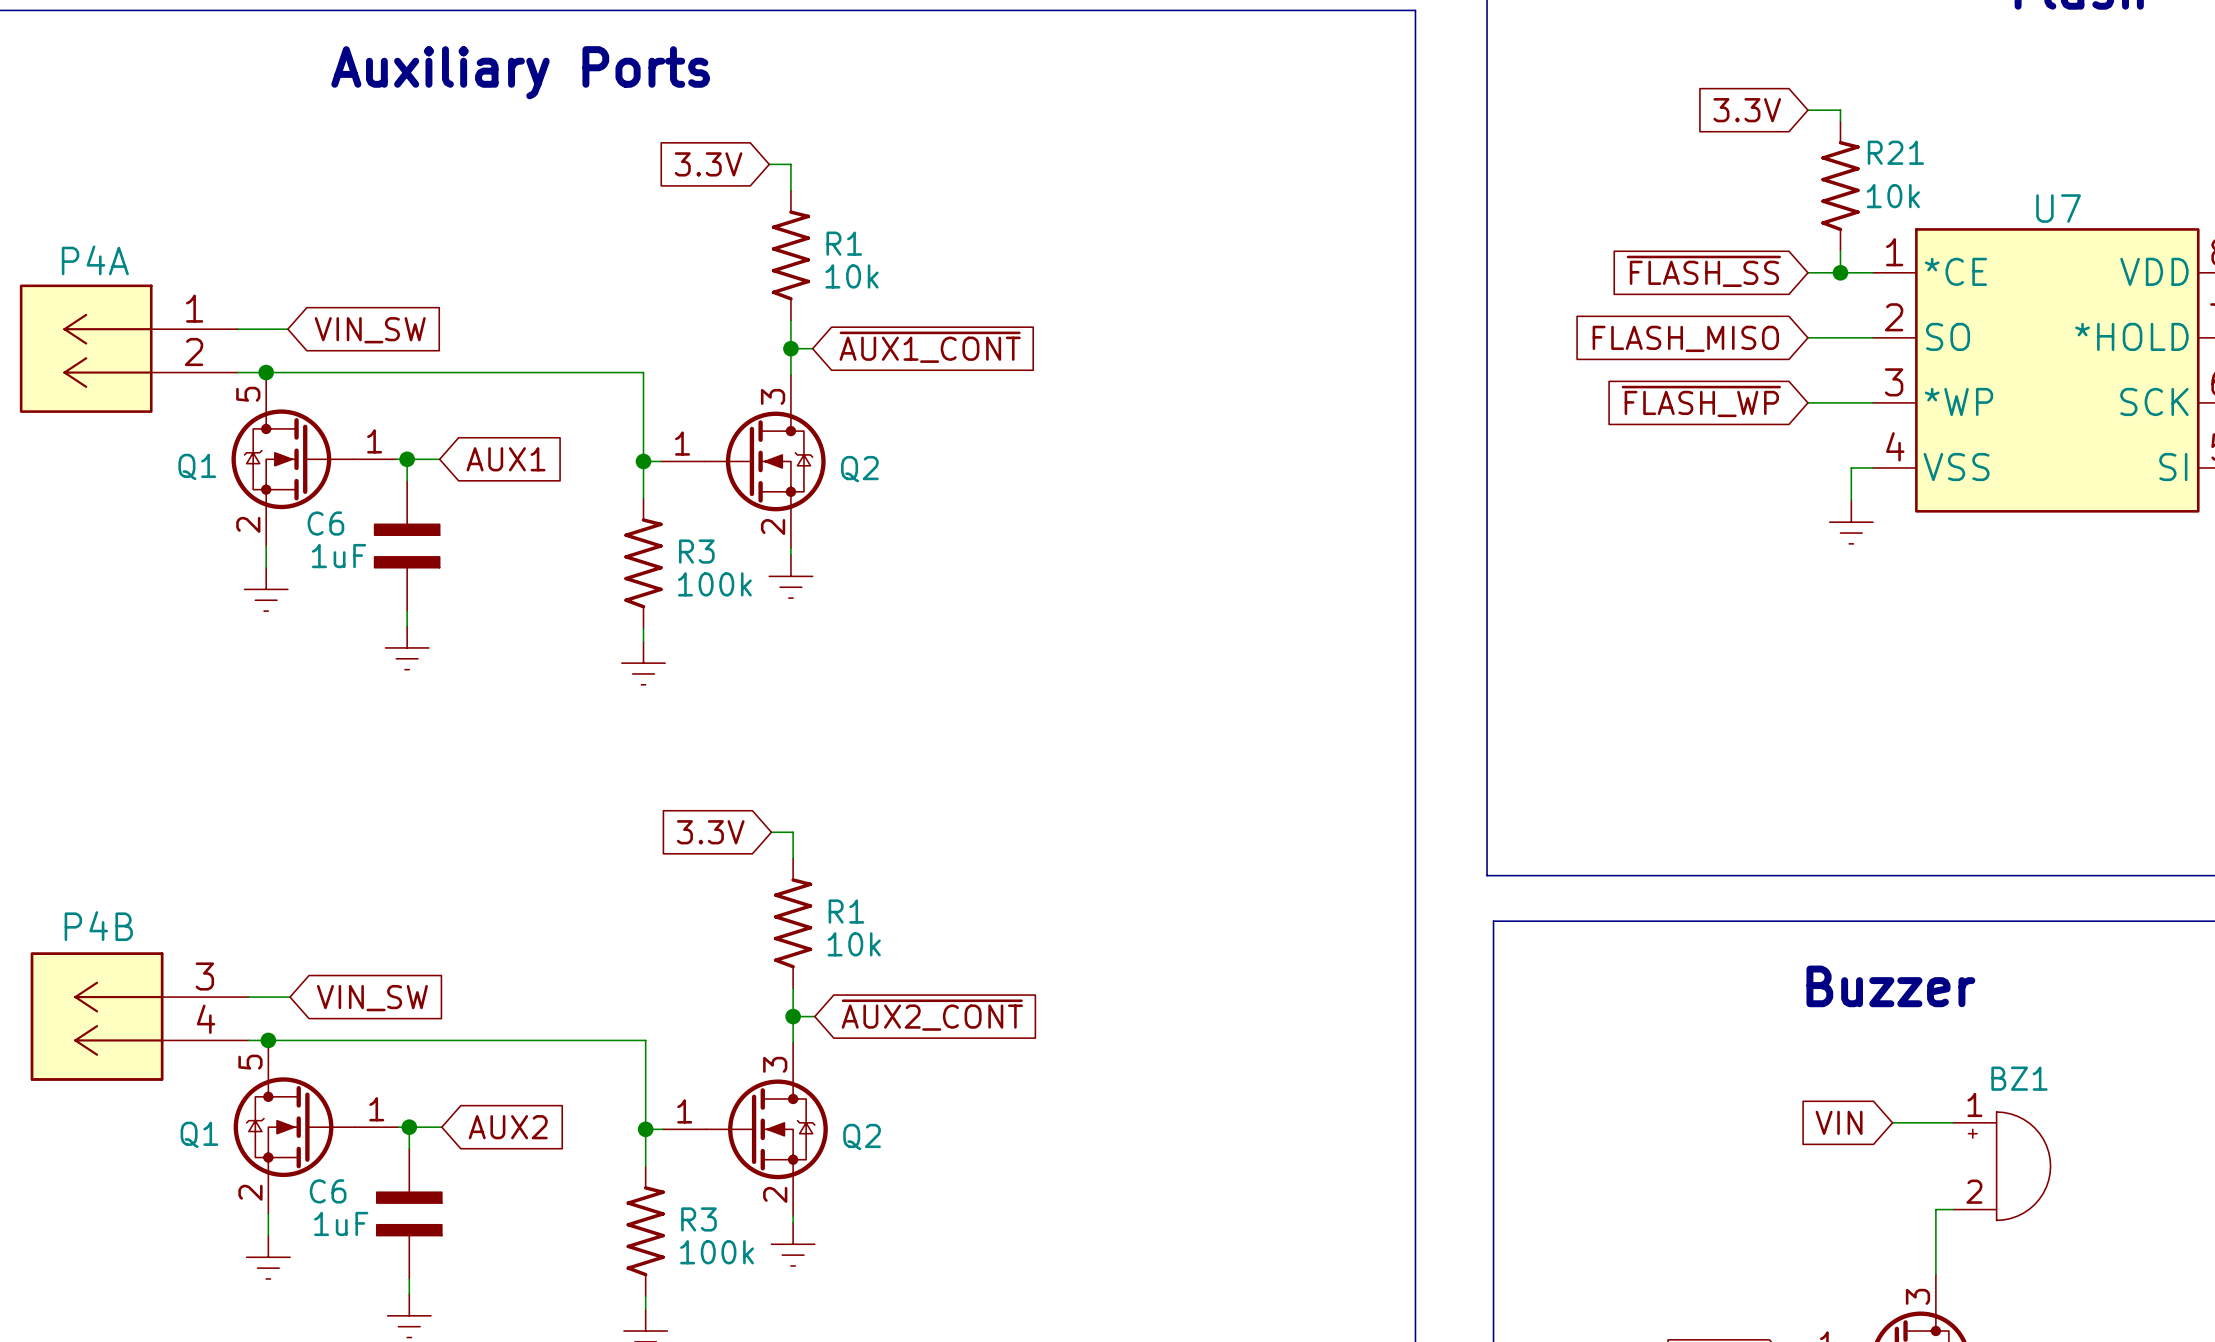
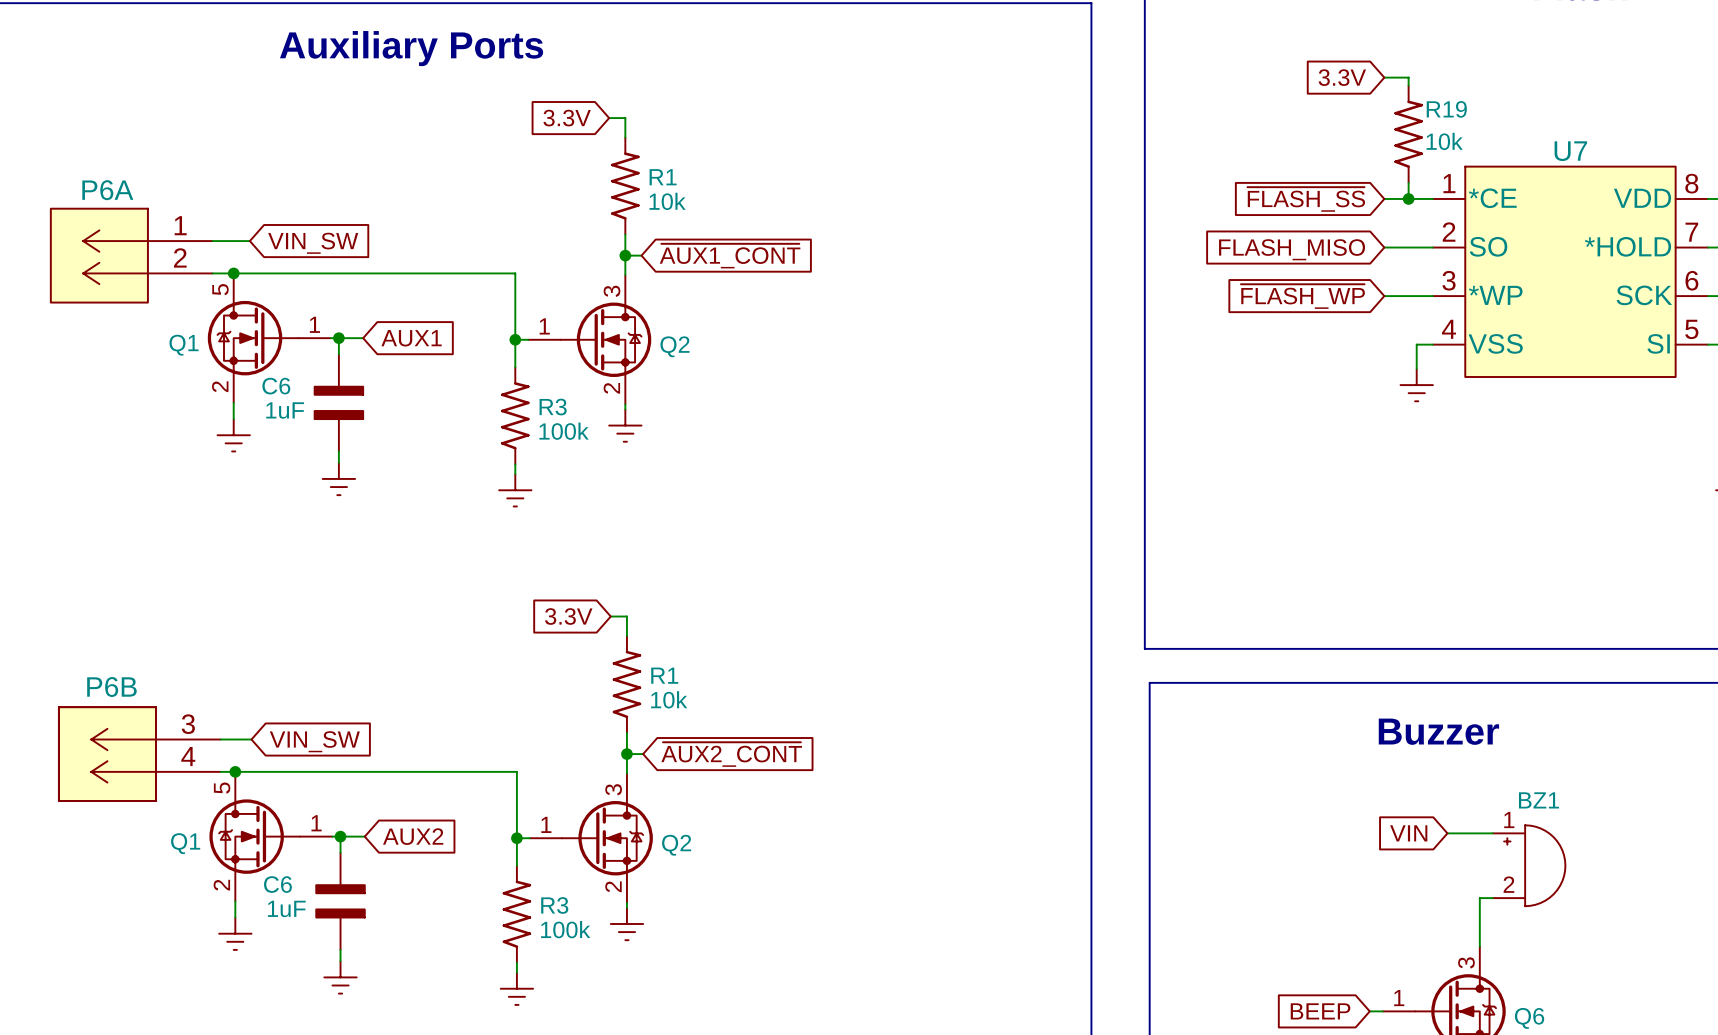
R21 name: R21 (1895, 152) -> R19 (1446, 109)
P4A name: P4A (95, 260) -> P6A (107, 190)
P4B name: P4B (98, 926) -> P6B (111, 686)

